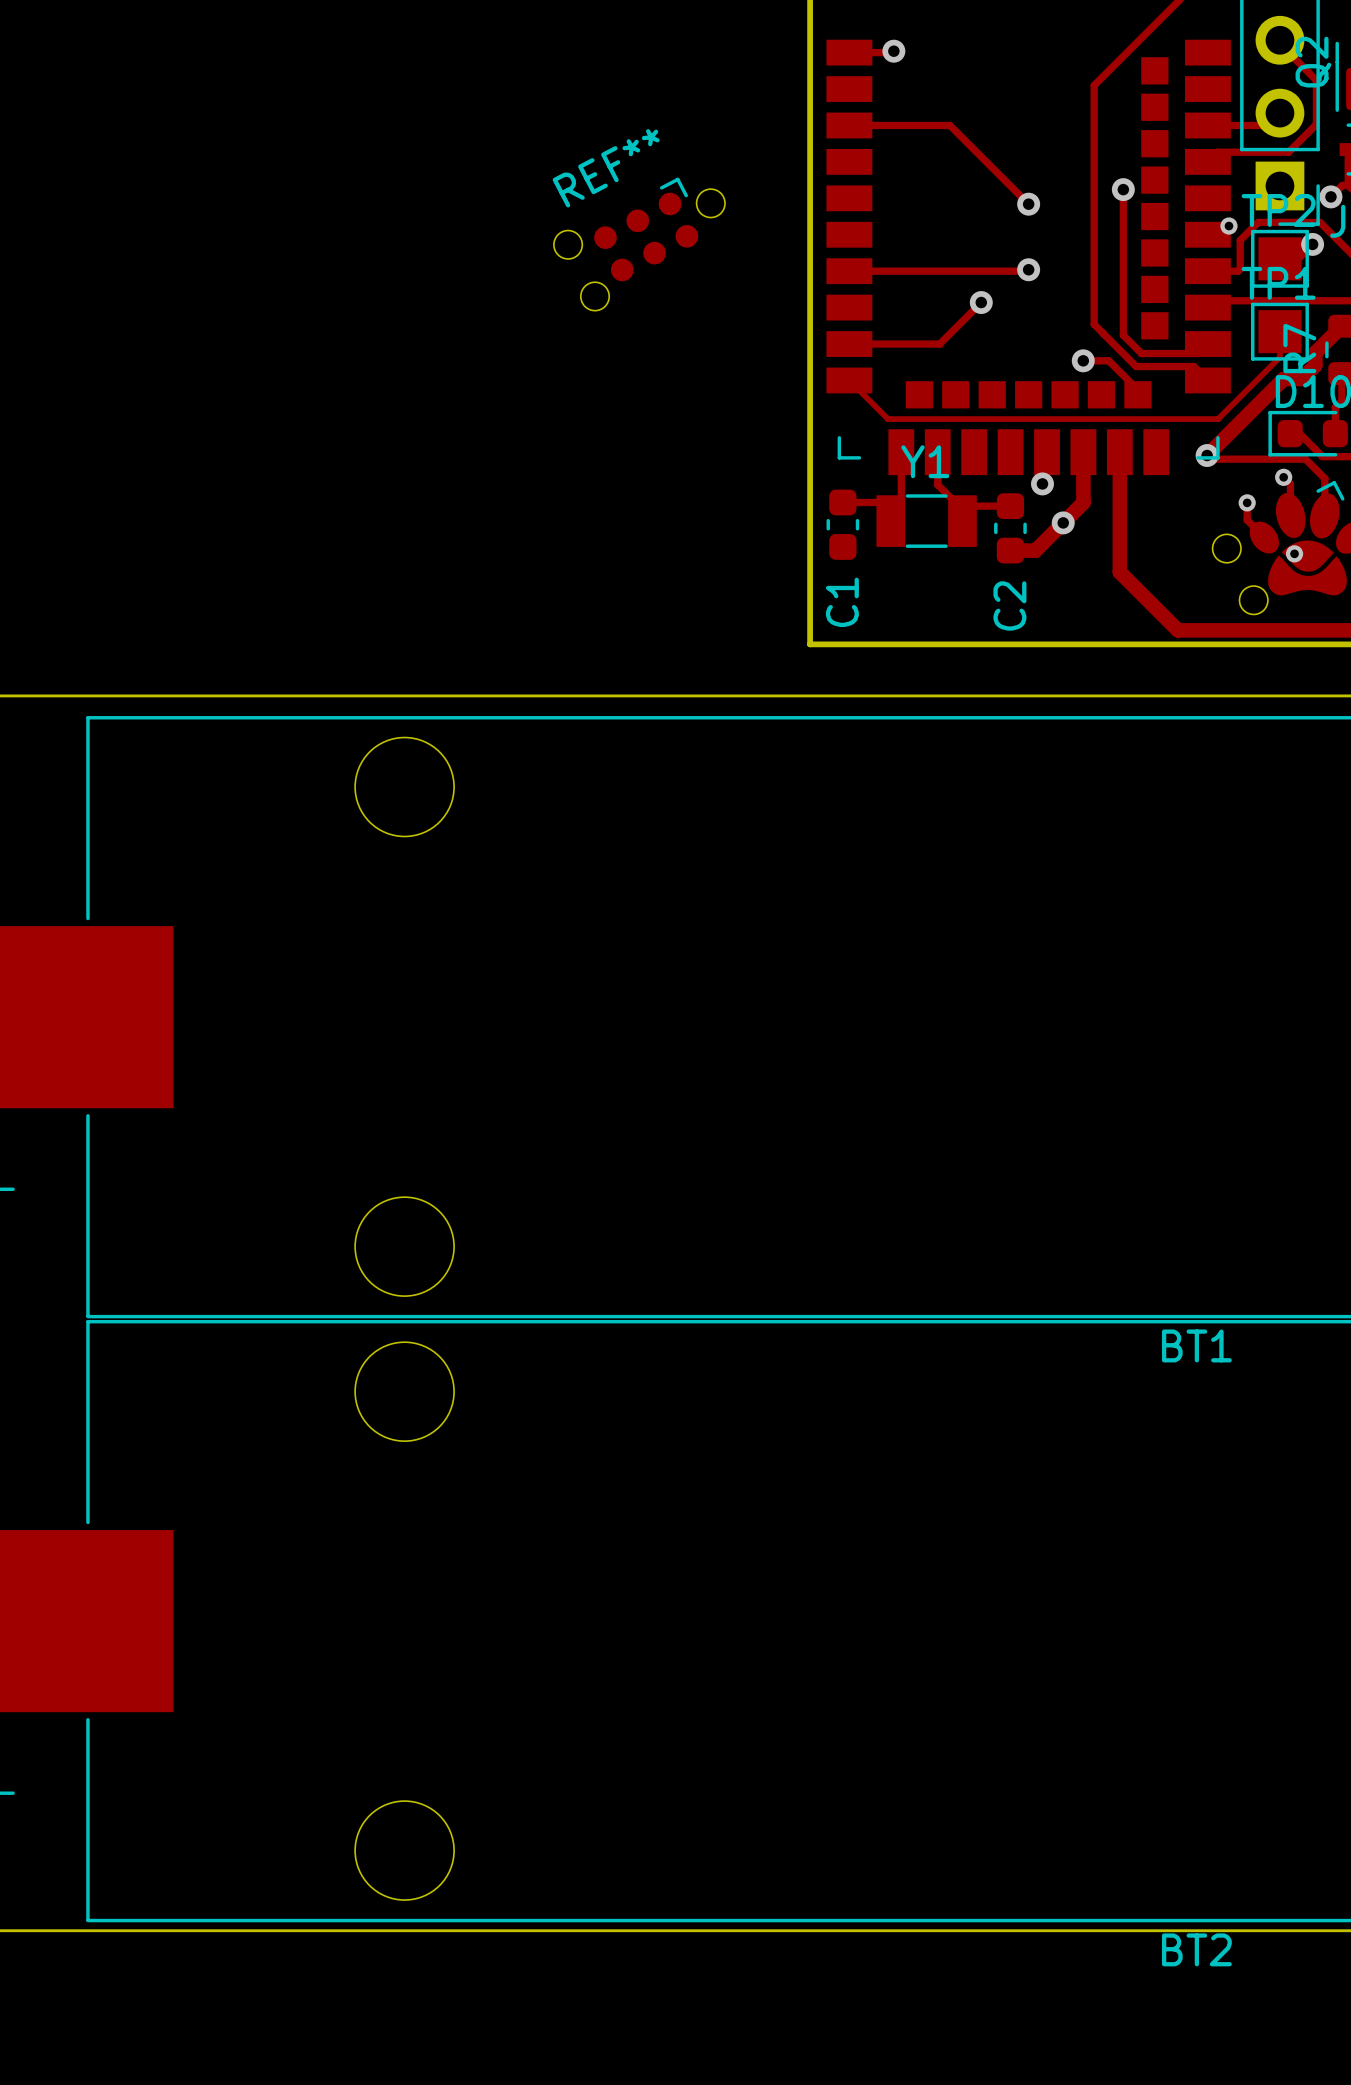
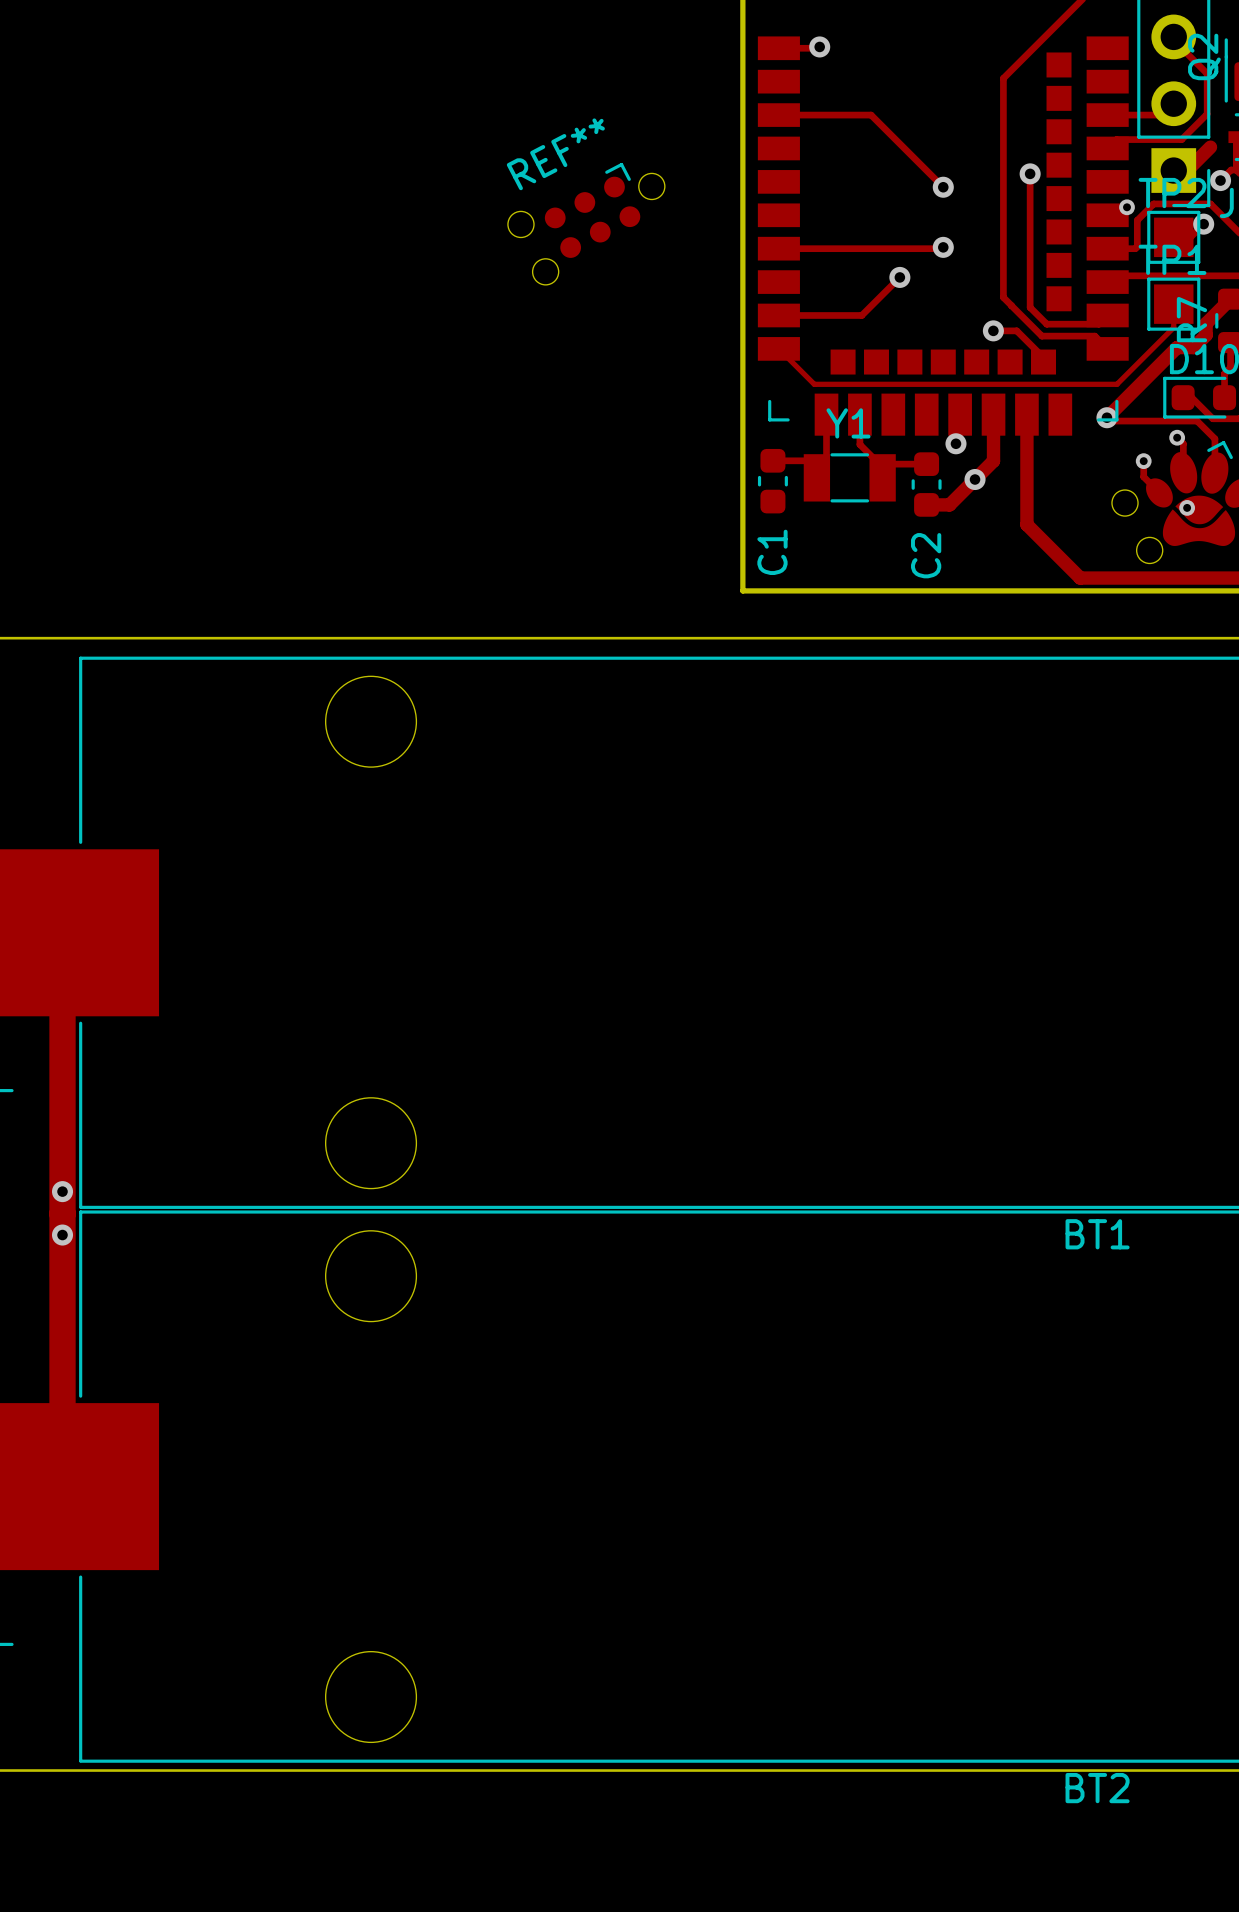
track: none -> (1210, 147) (1187, 170) (1173, 170)
track: none -> (62, 932) (62, 1486)
via: none -> (62, 1191)
via: none -> (62, 1235)

